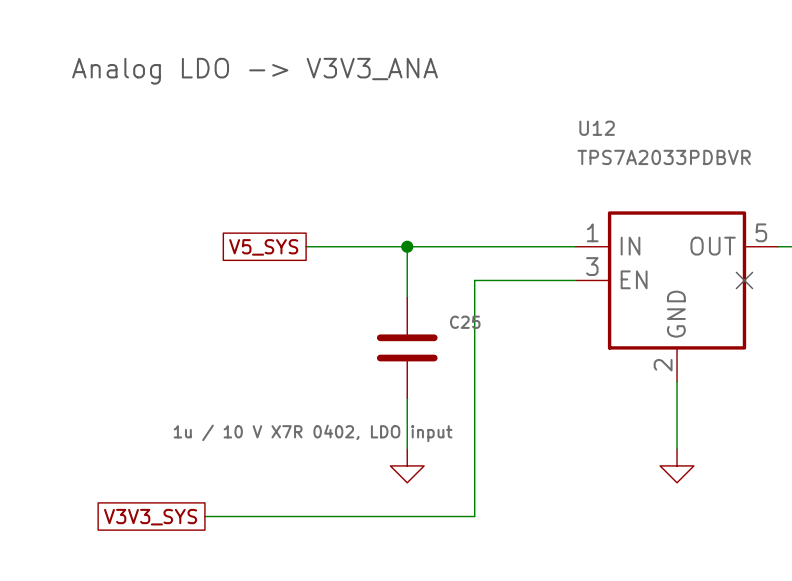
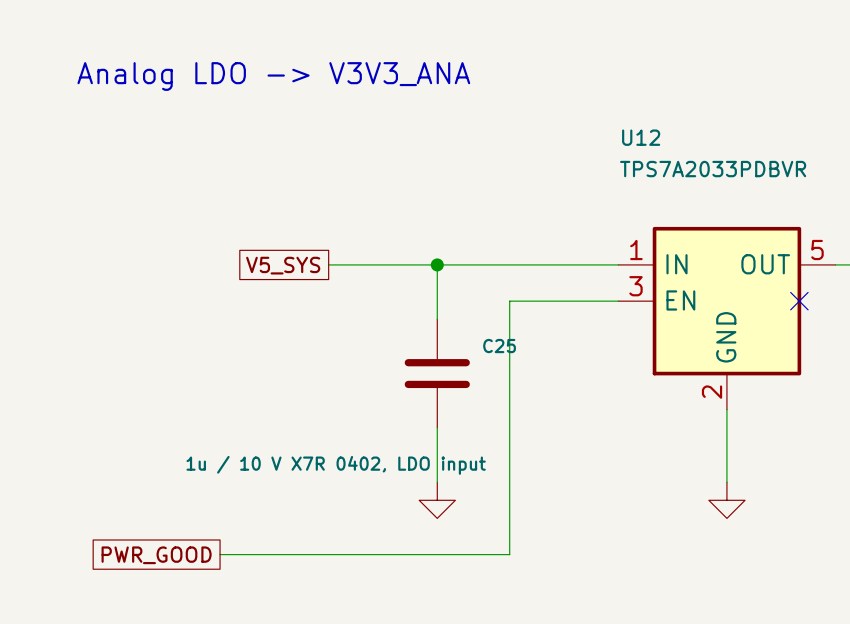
global label: V3V3_SYS (150, 517) -> PWR_GOOD (156, 555)

